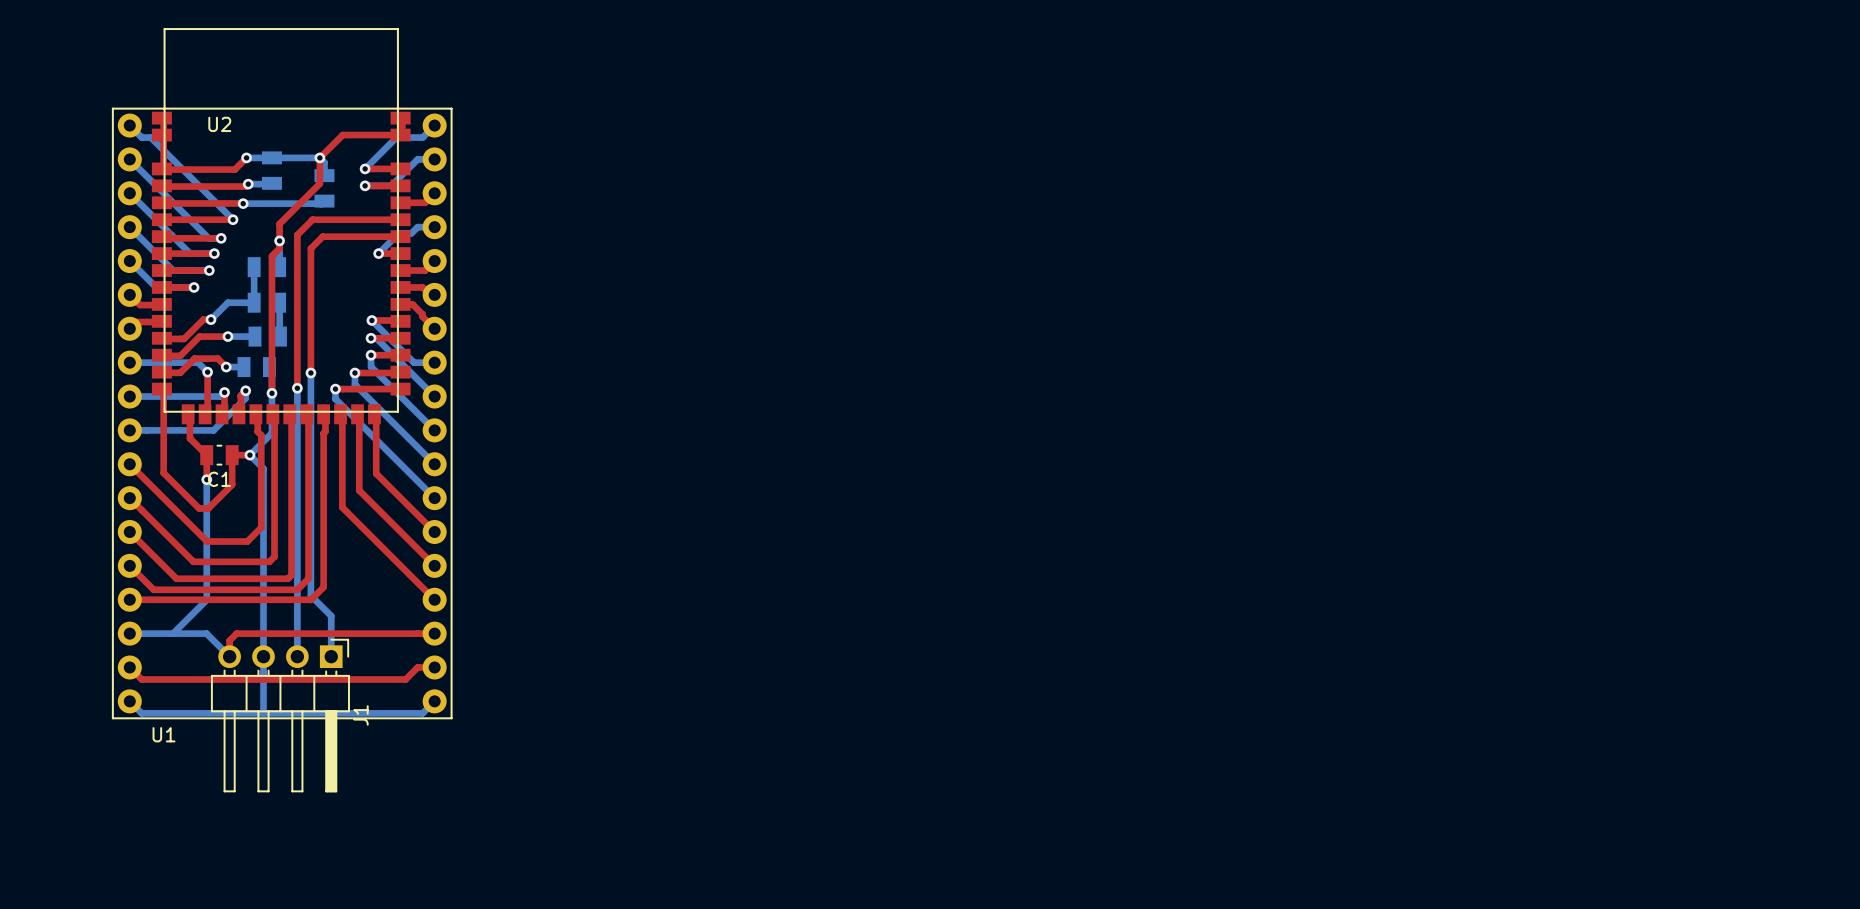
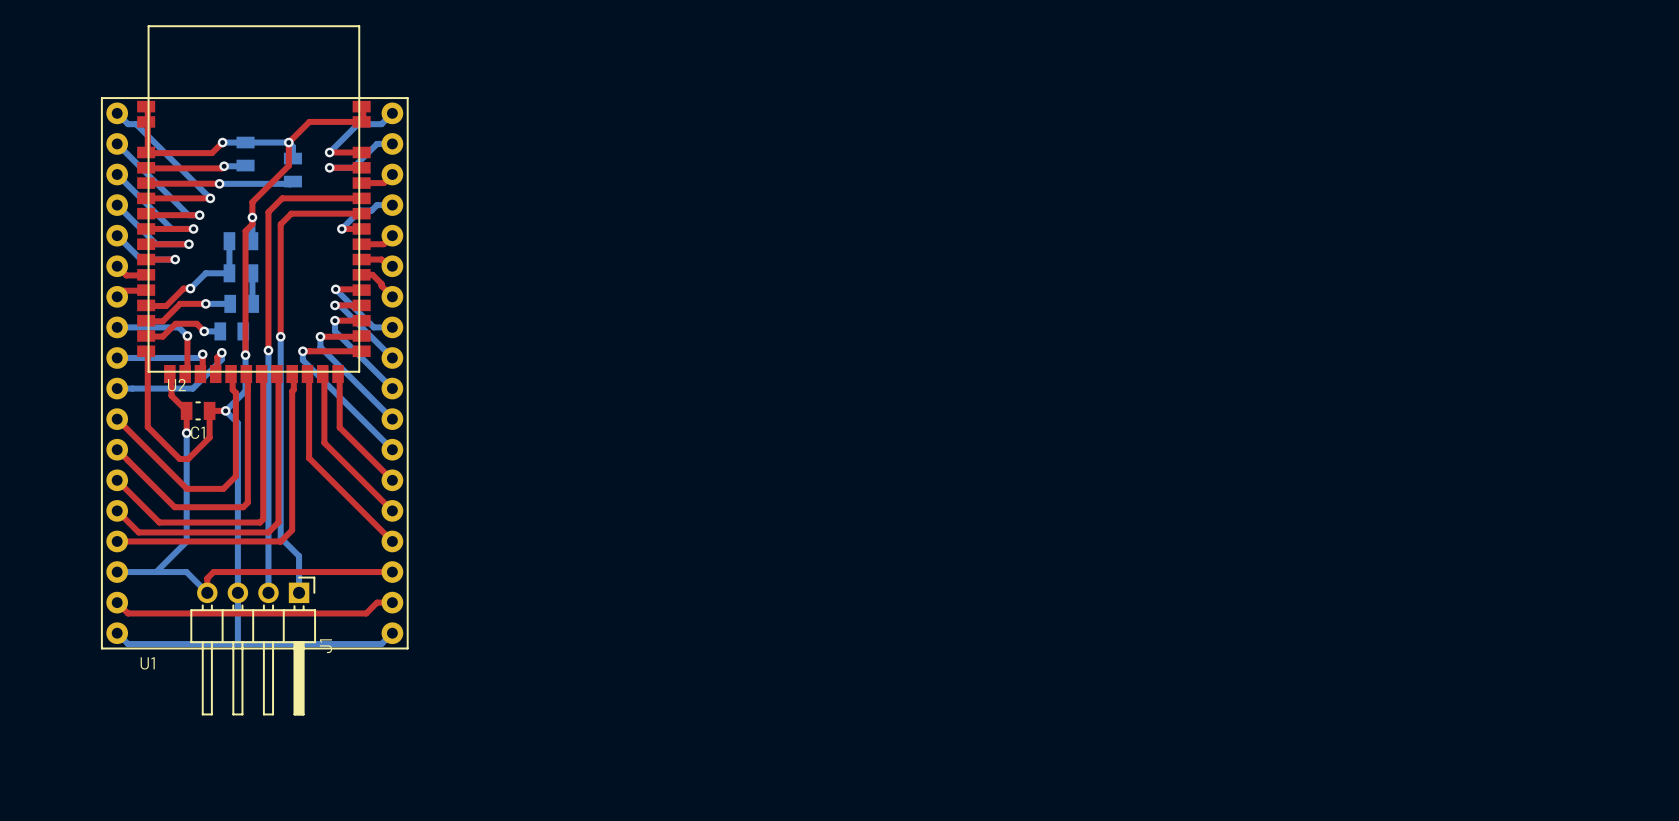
U2 name position: U2 (219, 124) -> U2 (176, 385)

